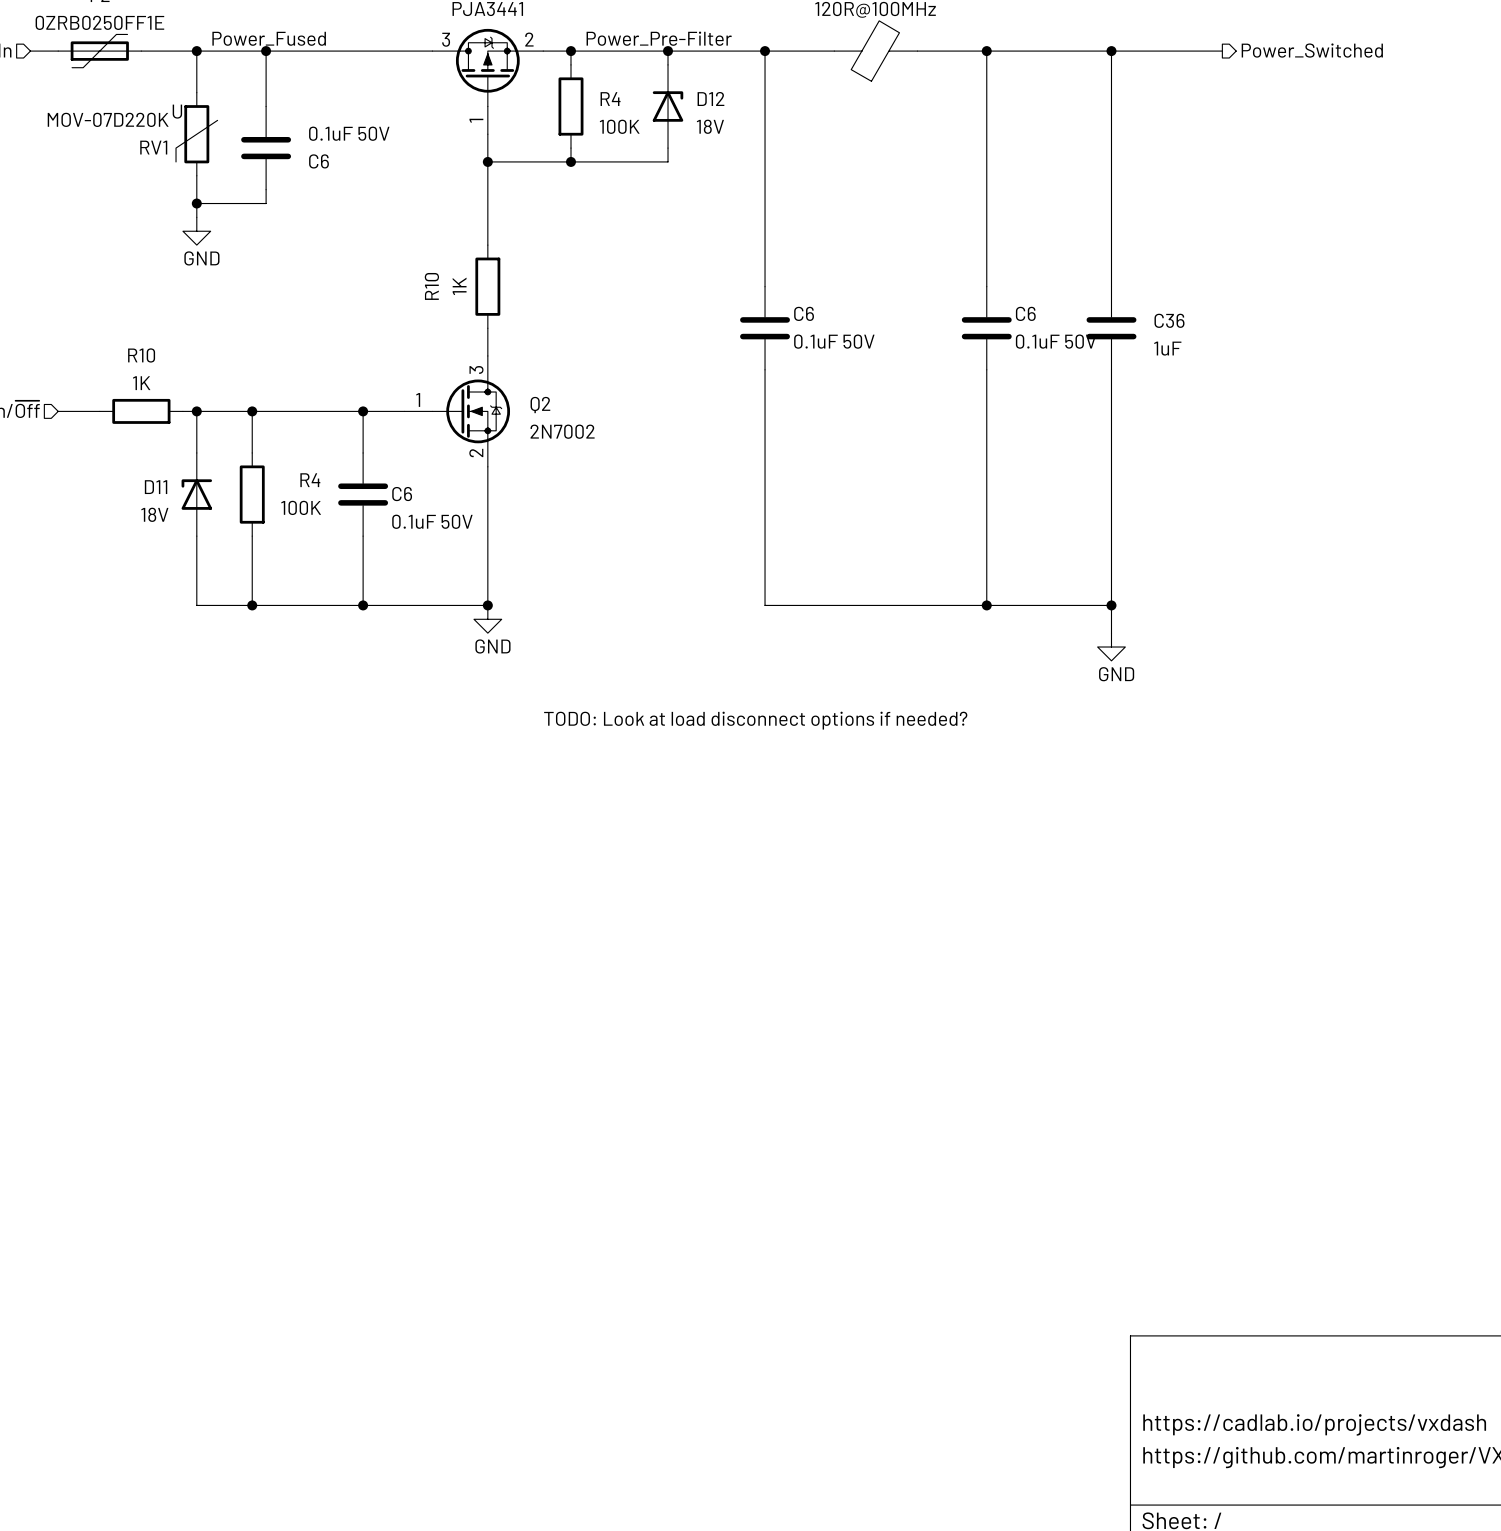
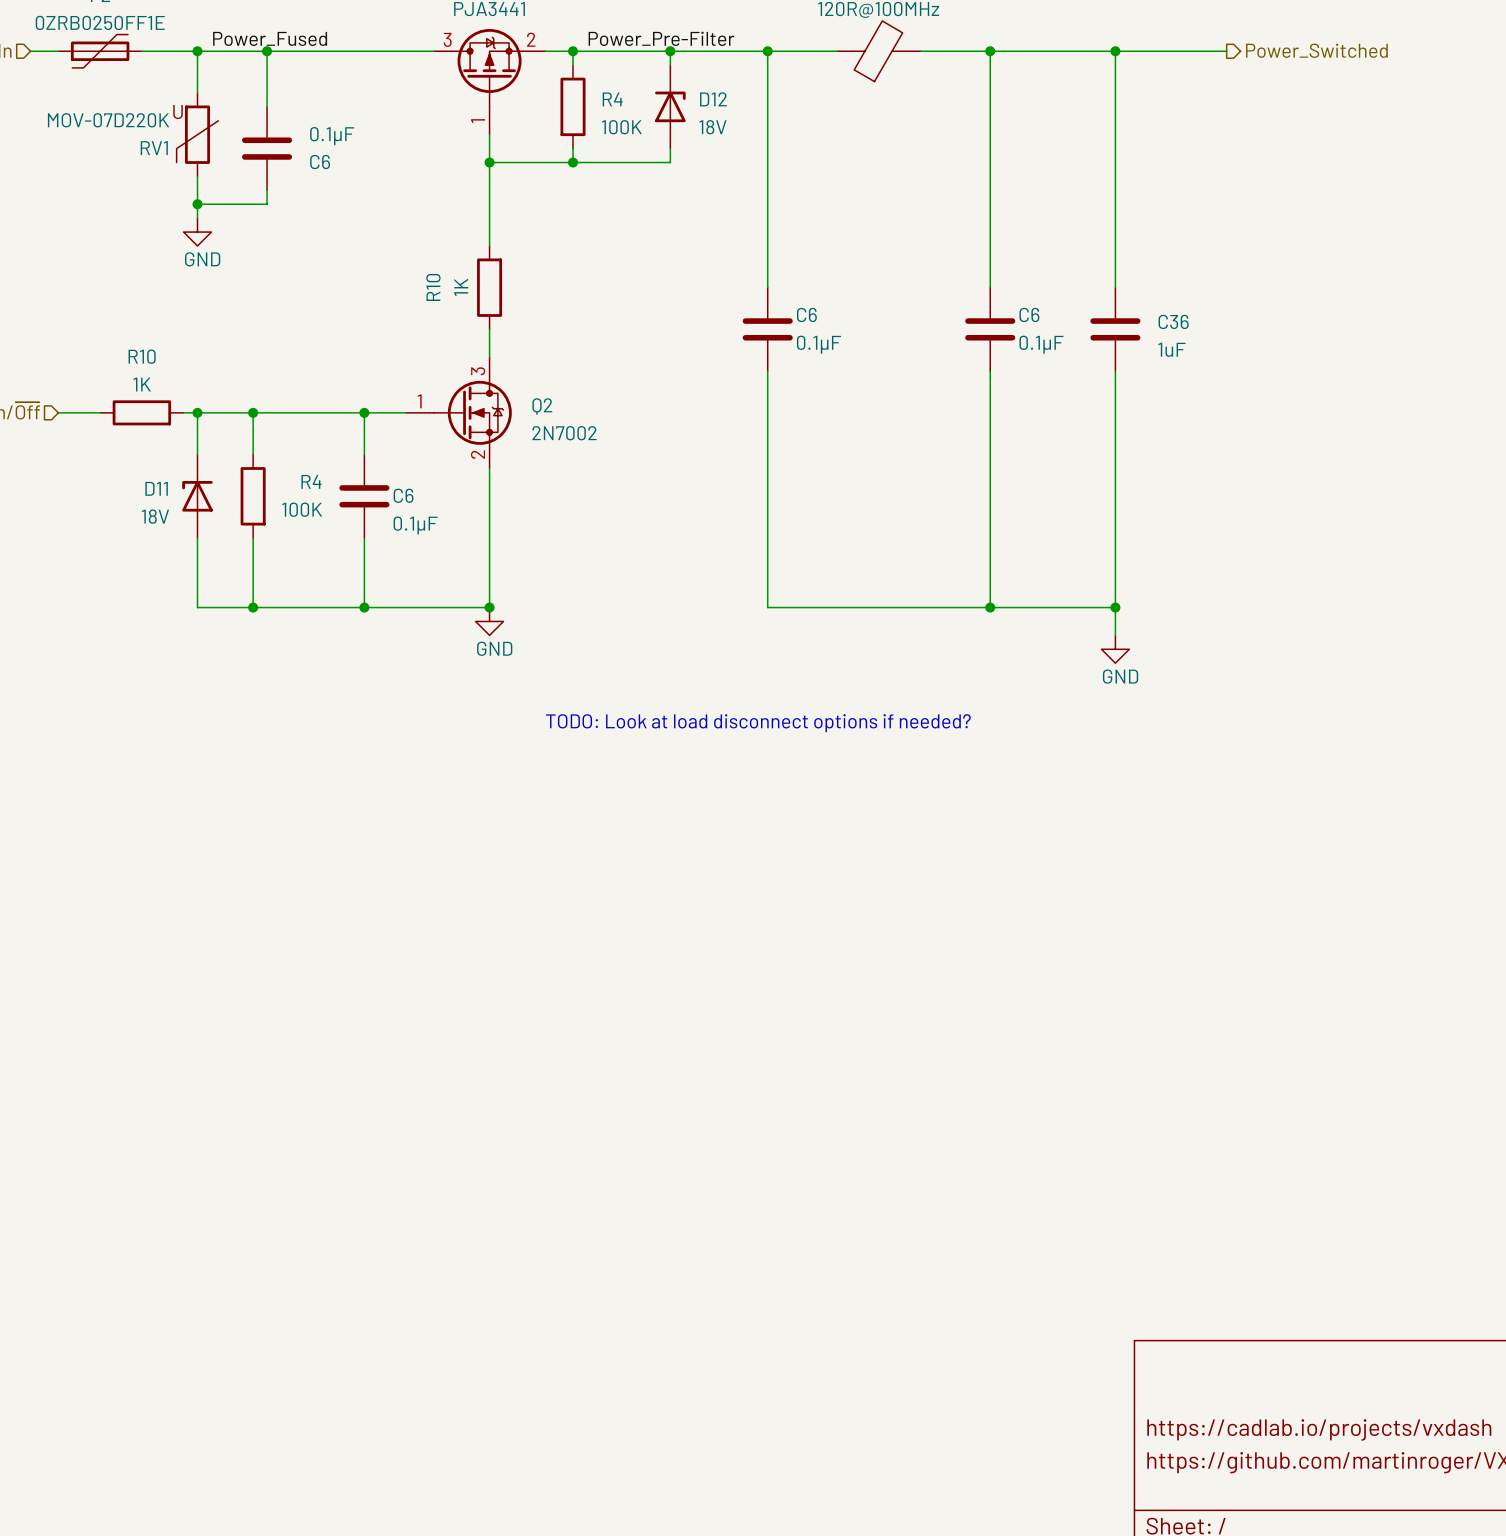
C6 value: 0.1uF 50V (349, 133) -> 0.1µF (332, 136)
C6 value: 0.1uF 50V (834, 341) -> 0.1µF (818, 344)
C6 value: 0.1uF 50V (1056, 341) -> 0.1µF (1041, 344)
C6 value: 0.1uF 50V (432, 521) -> 0.1µF (415, 525)

